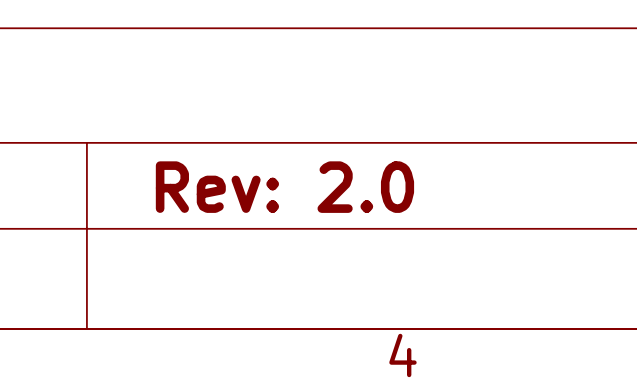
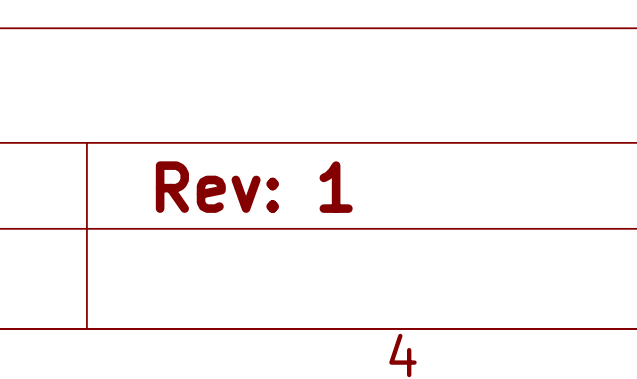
title block: Rev: 2.0 (284, 187) -> Rev: 1 (254, 187)

